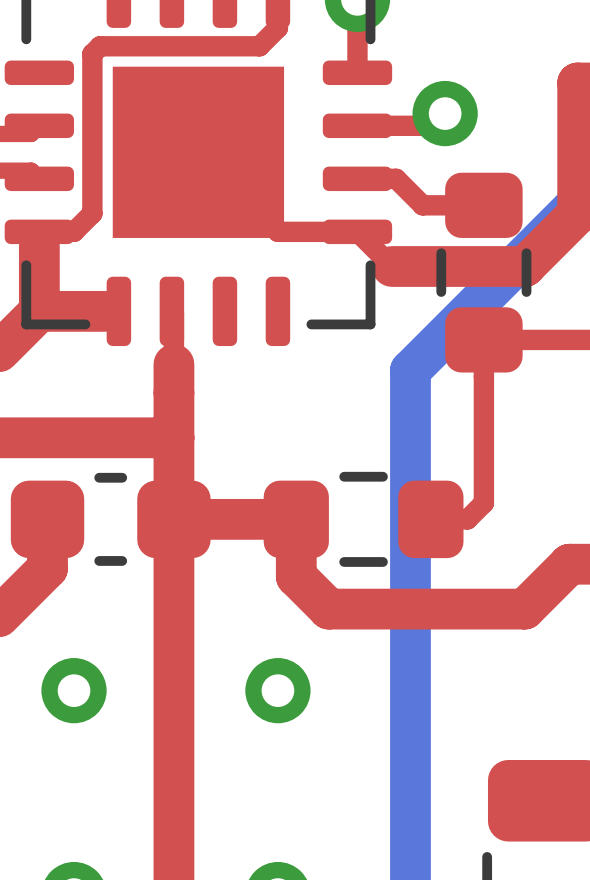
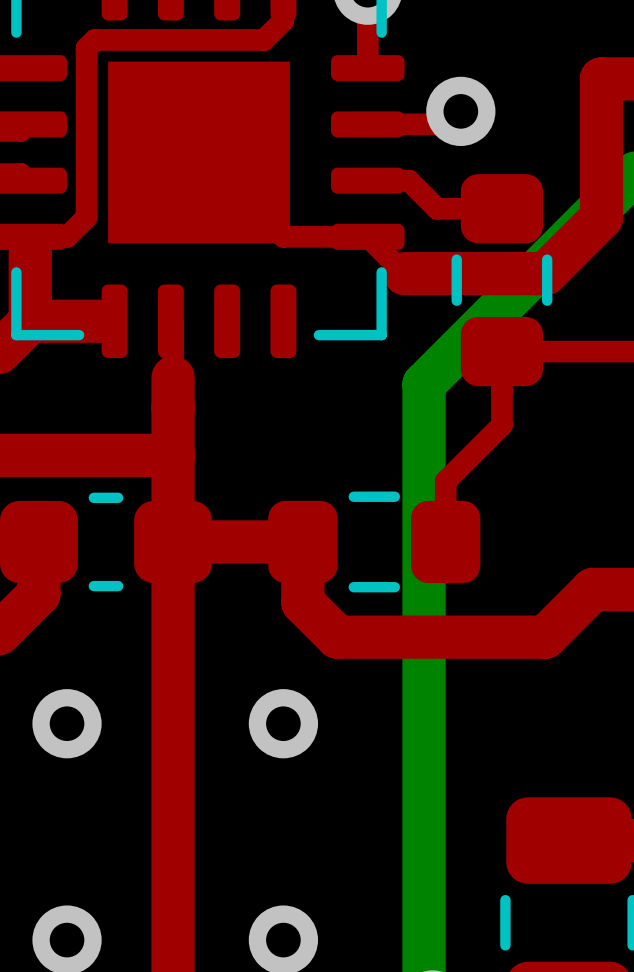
top track: (483, 409) (483, 503) (467, 519) (430, 519) -> (501, 425) (445, 481) (445, 541)

